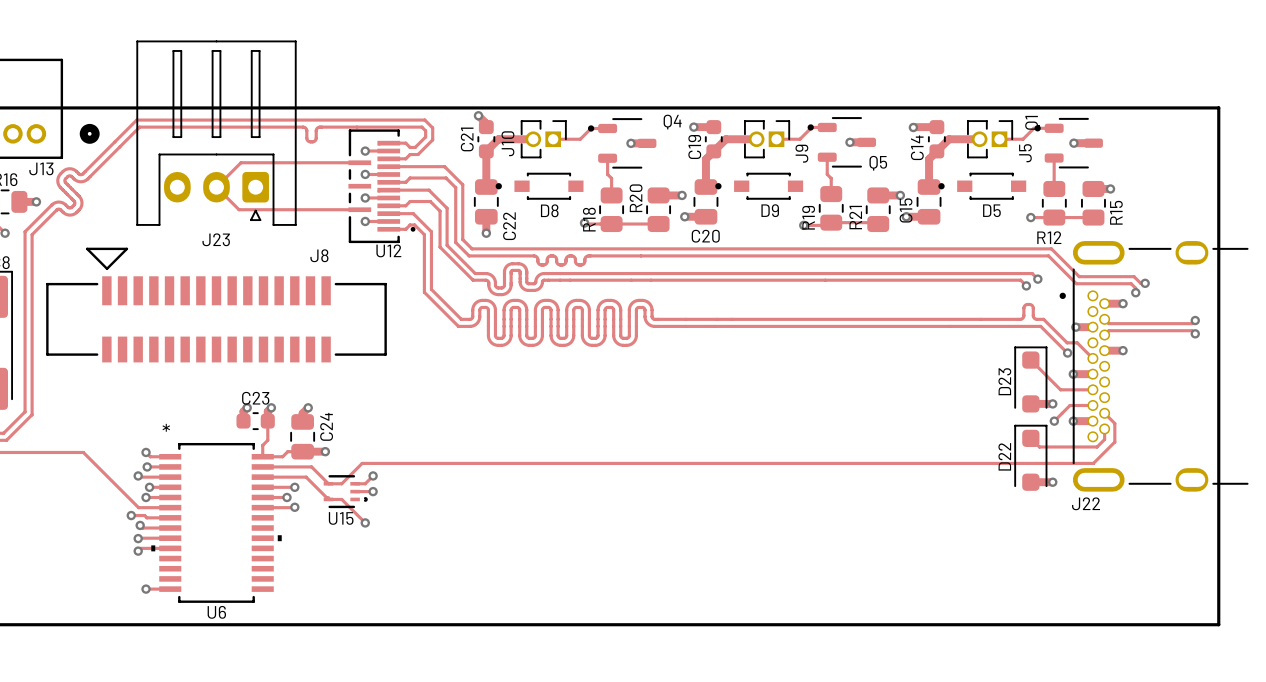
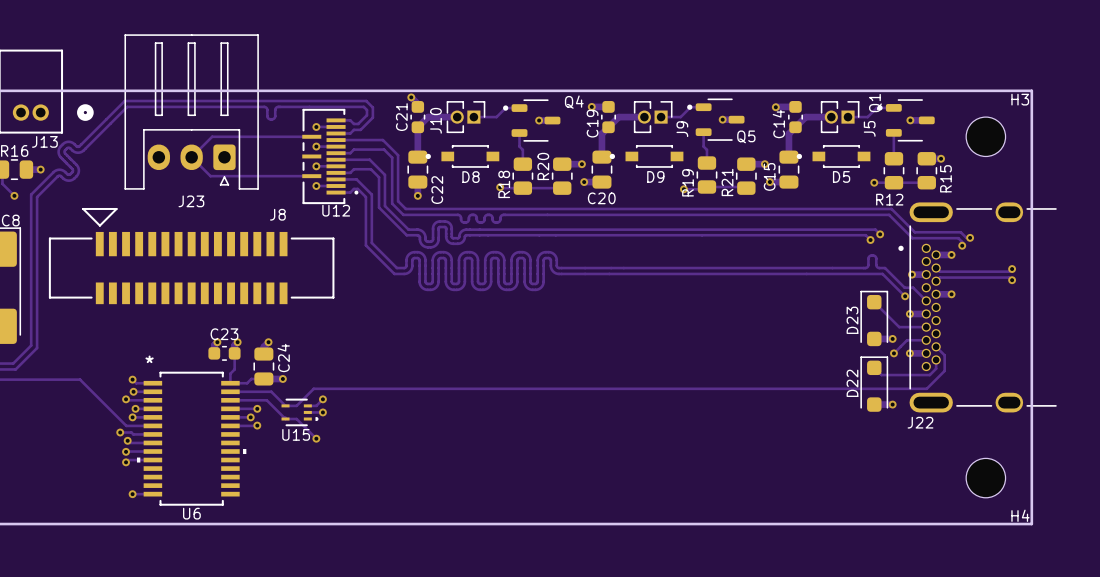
H3: none -> (985, 136)
H4: none -> (985, 478)

